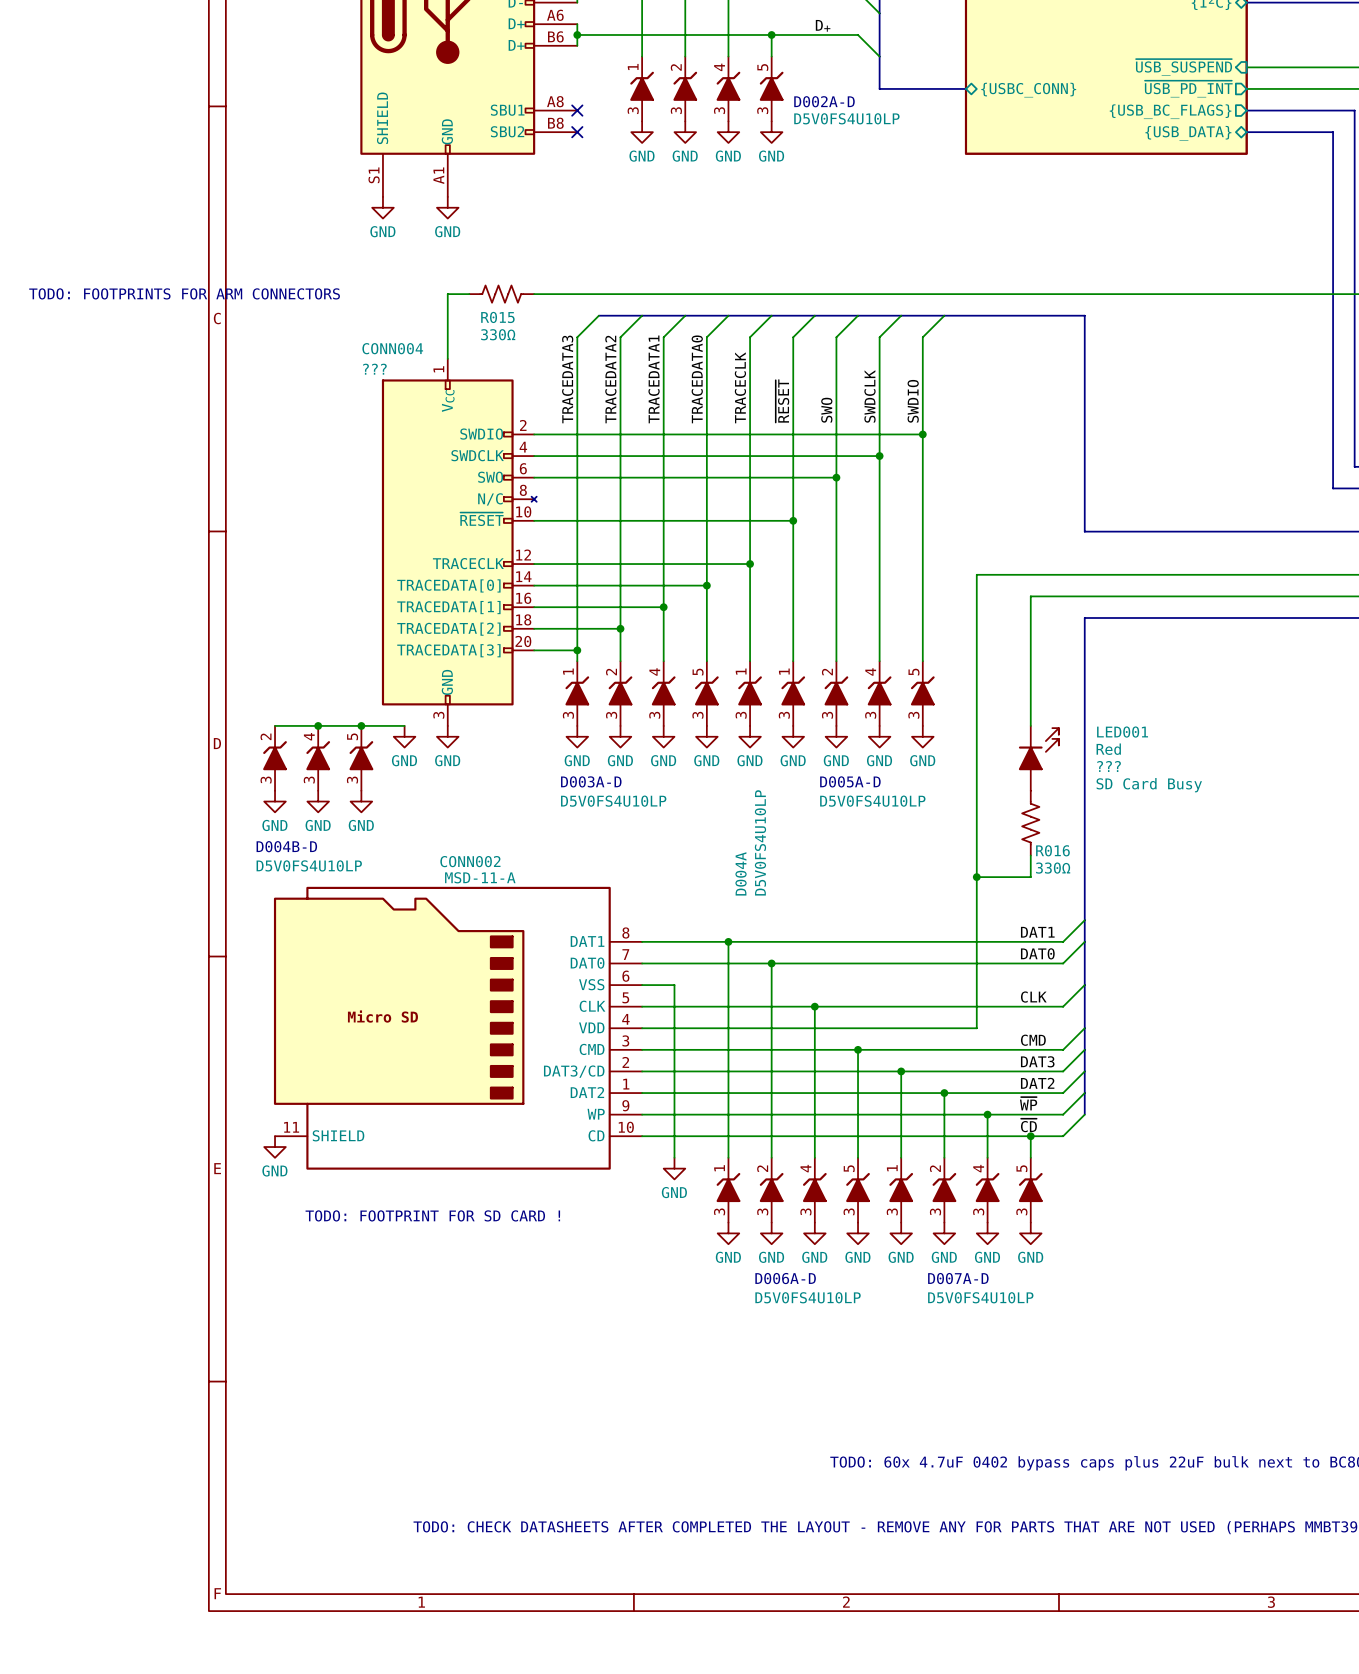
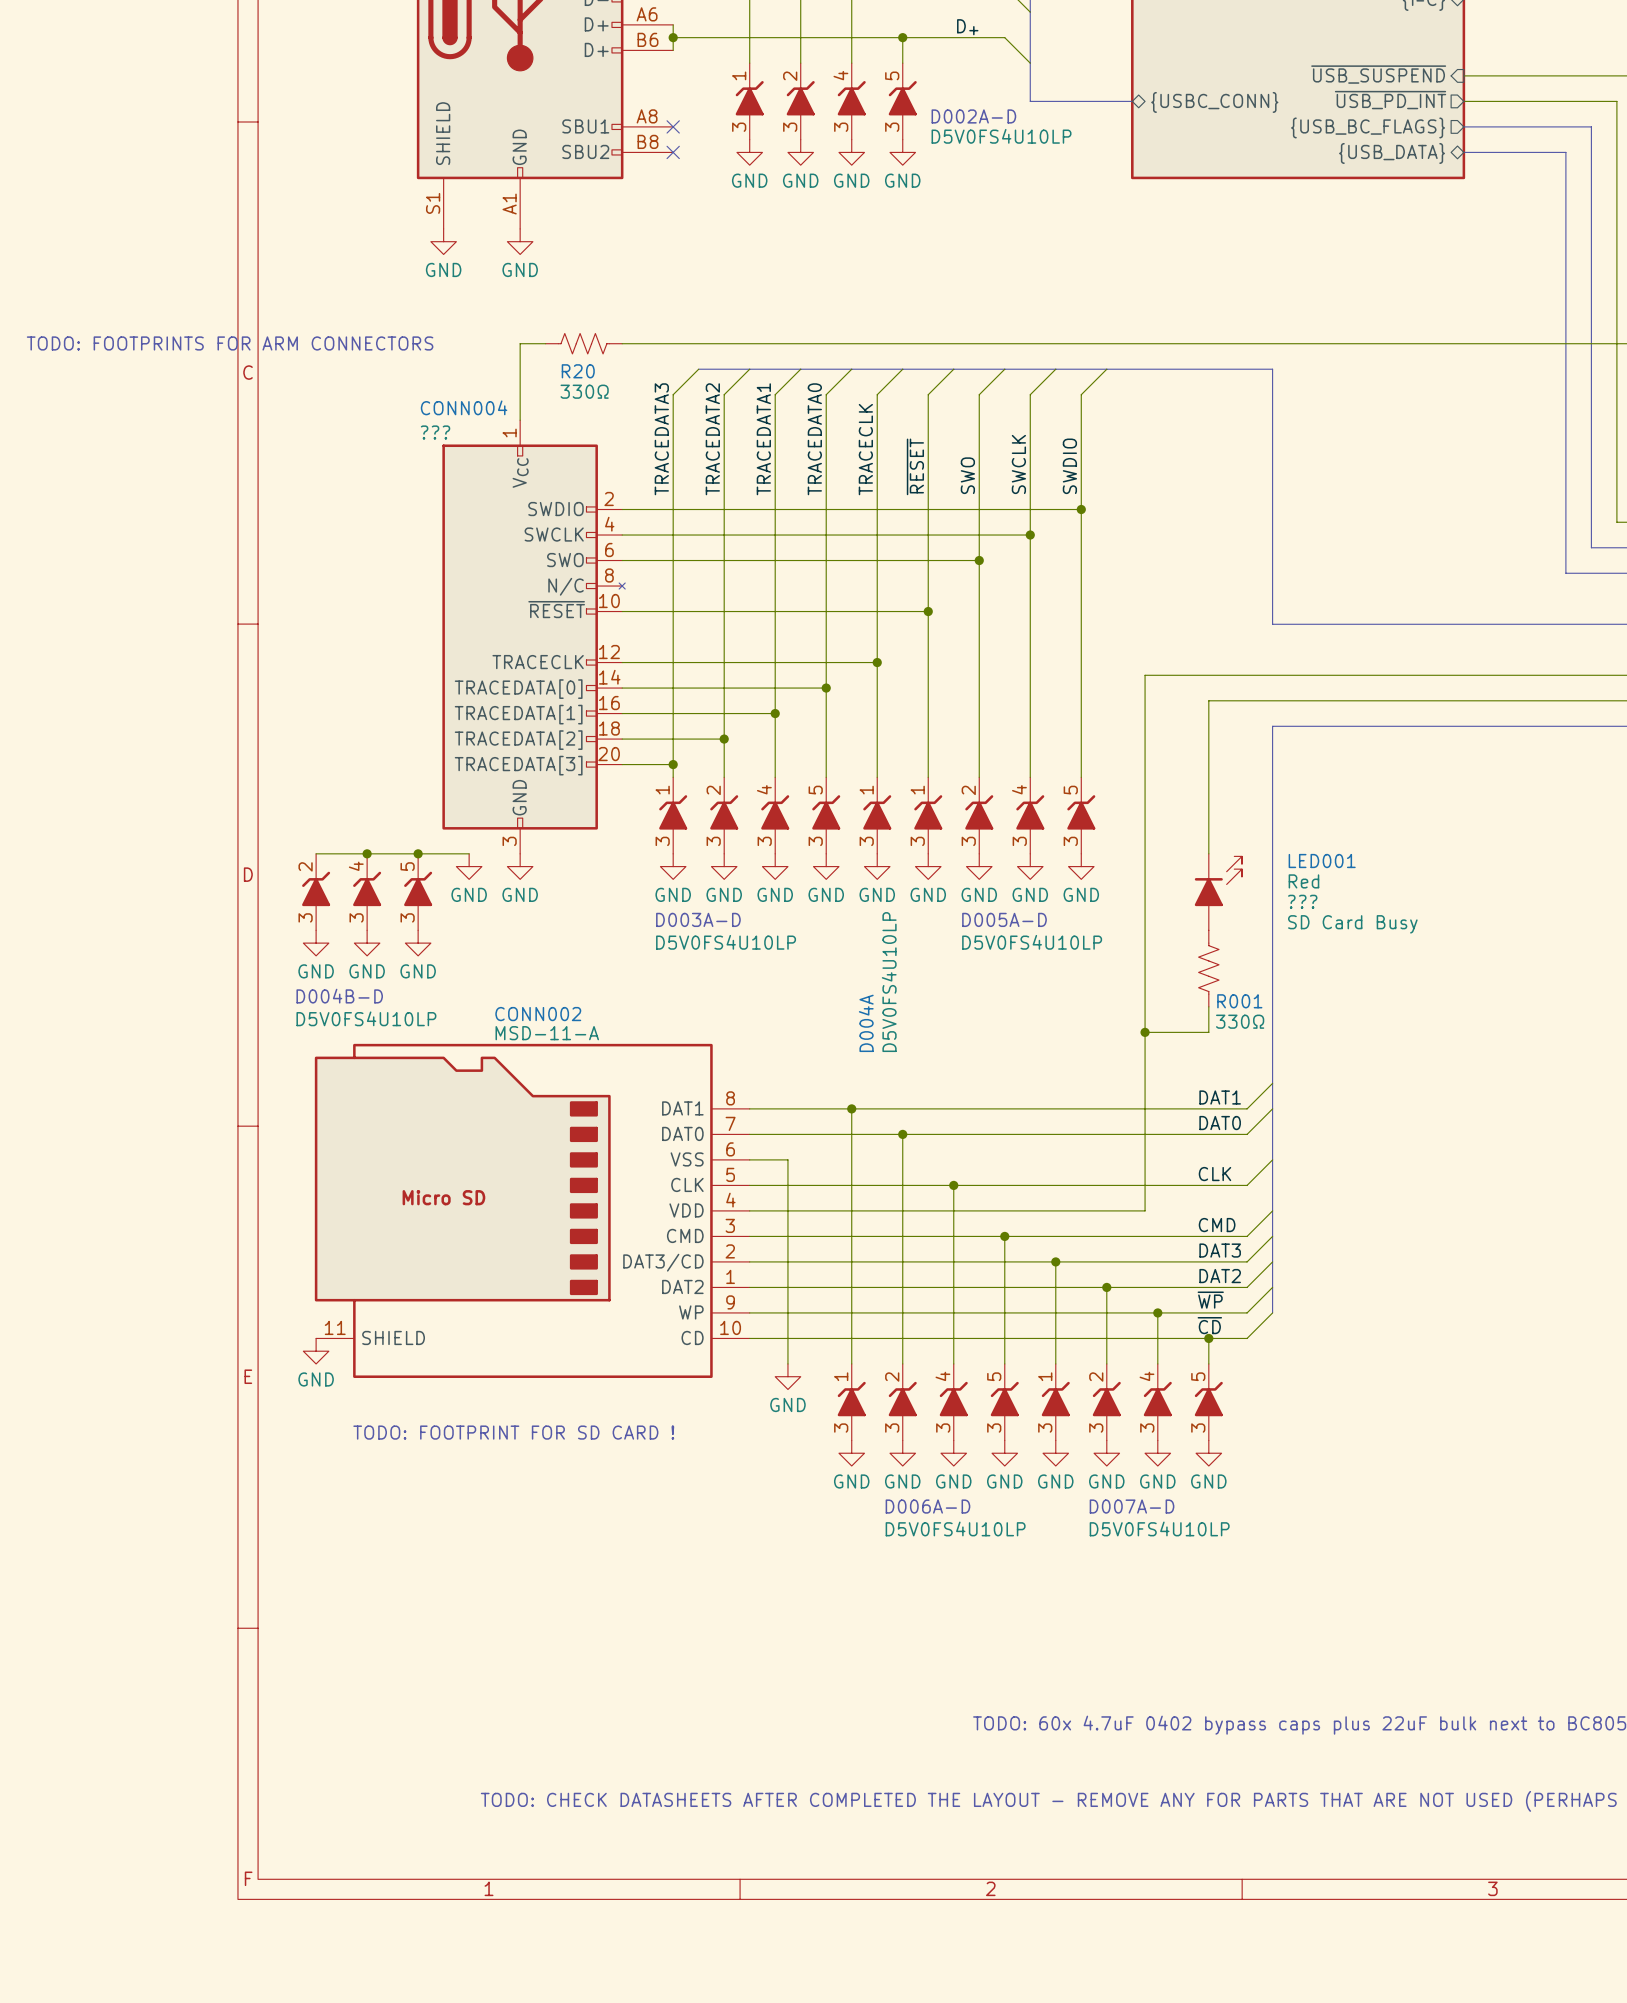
R015 name: R015 (497, 317) -> R20 (578, 371)
label: SWDCLK (869, 396) -> SWCLK (1018, 464)
CONN004 pin name: SWDCLK (477, 455) -> SWCLK (554, 534)
R016 name: R016 (1052, 850) -> R001 (1239, 1001)

